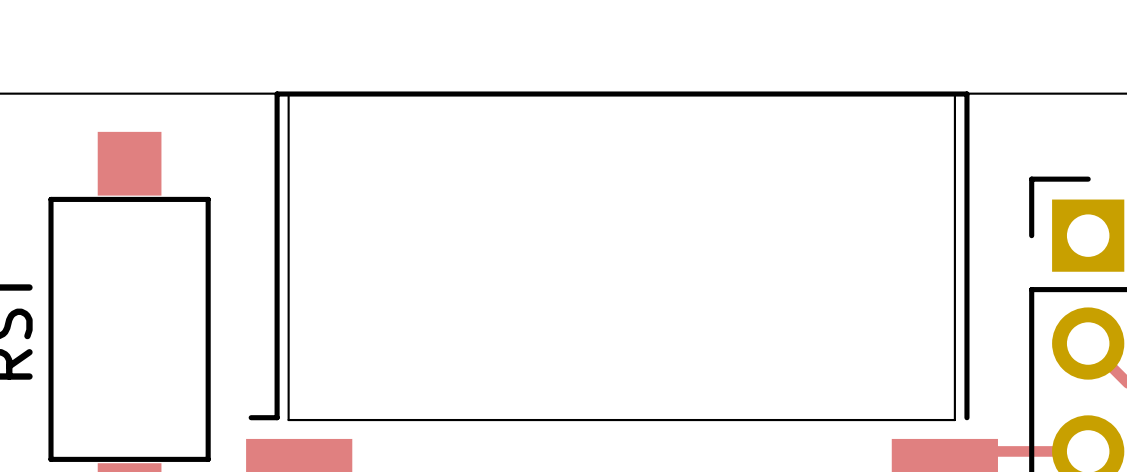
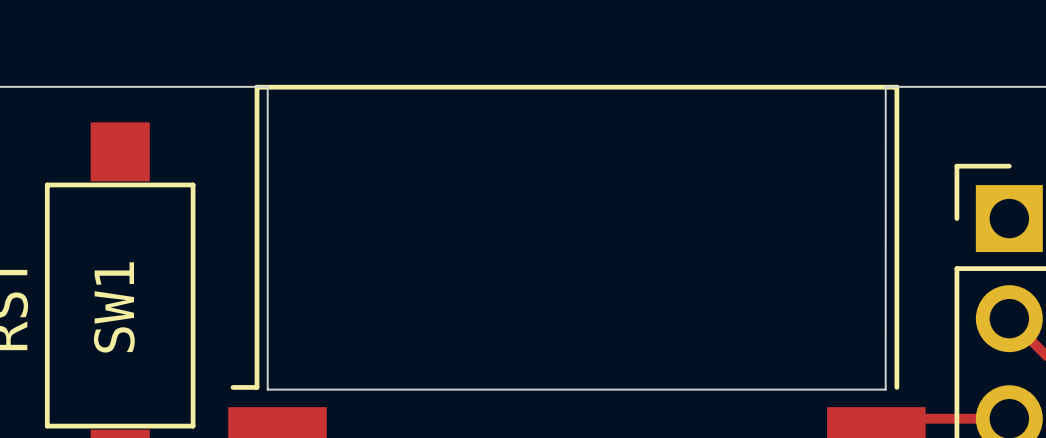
SW1 name: none -> SW1 (114, 307)

